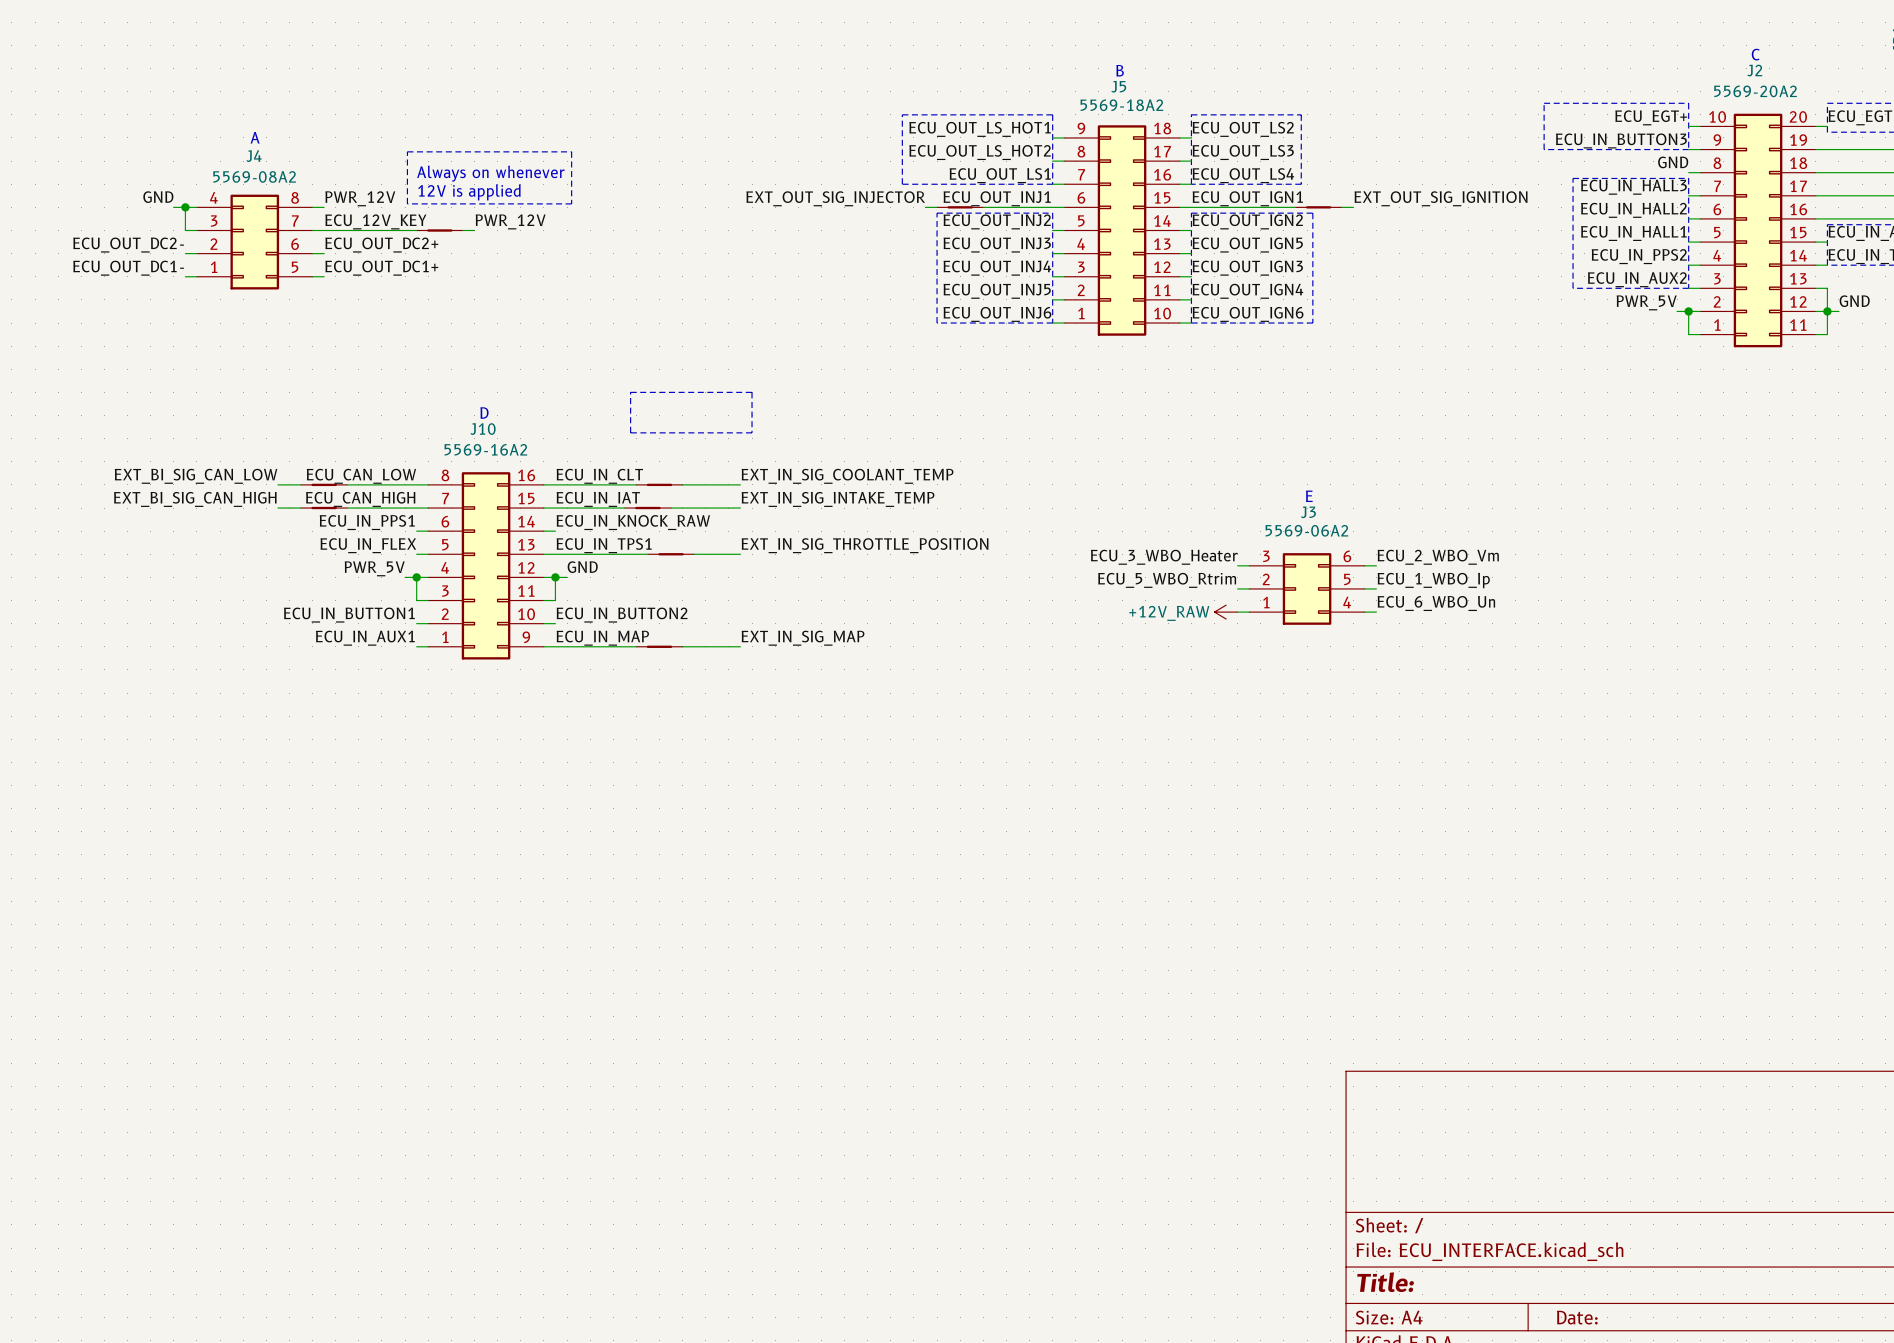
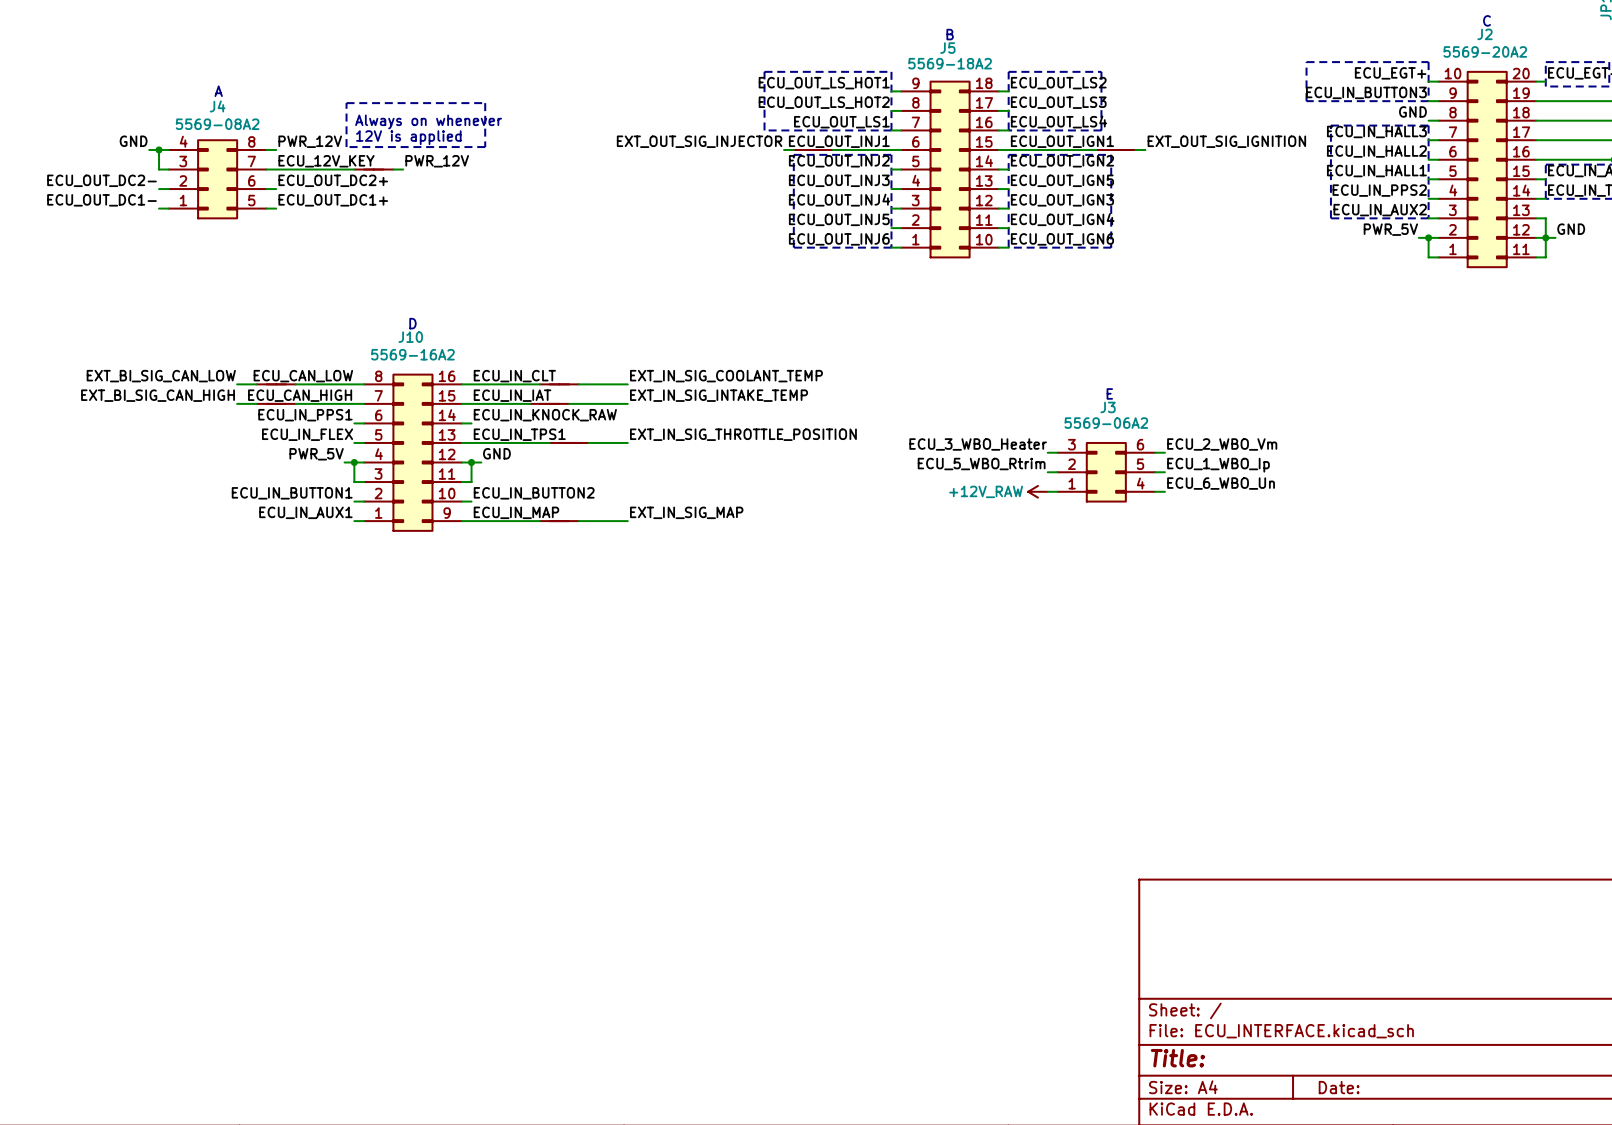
line: (630, 392) (752, 392) (752, 432) (630, 432) (630, 392) -> none

